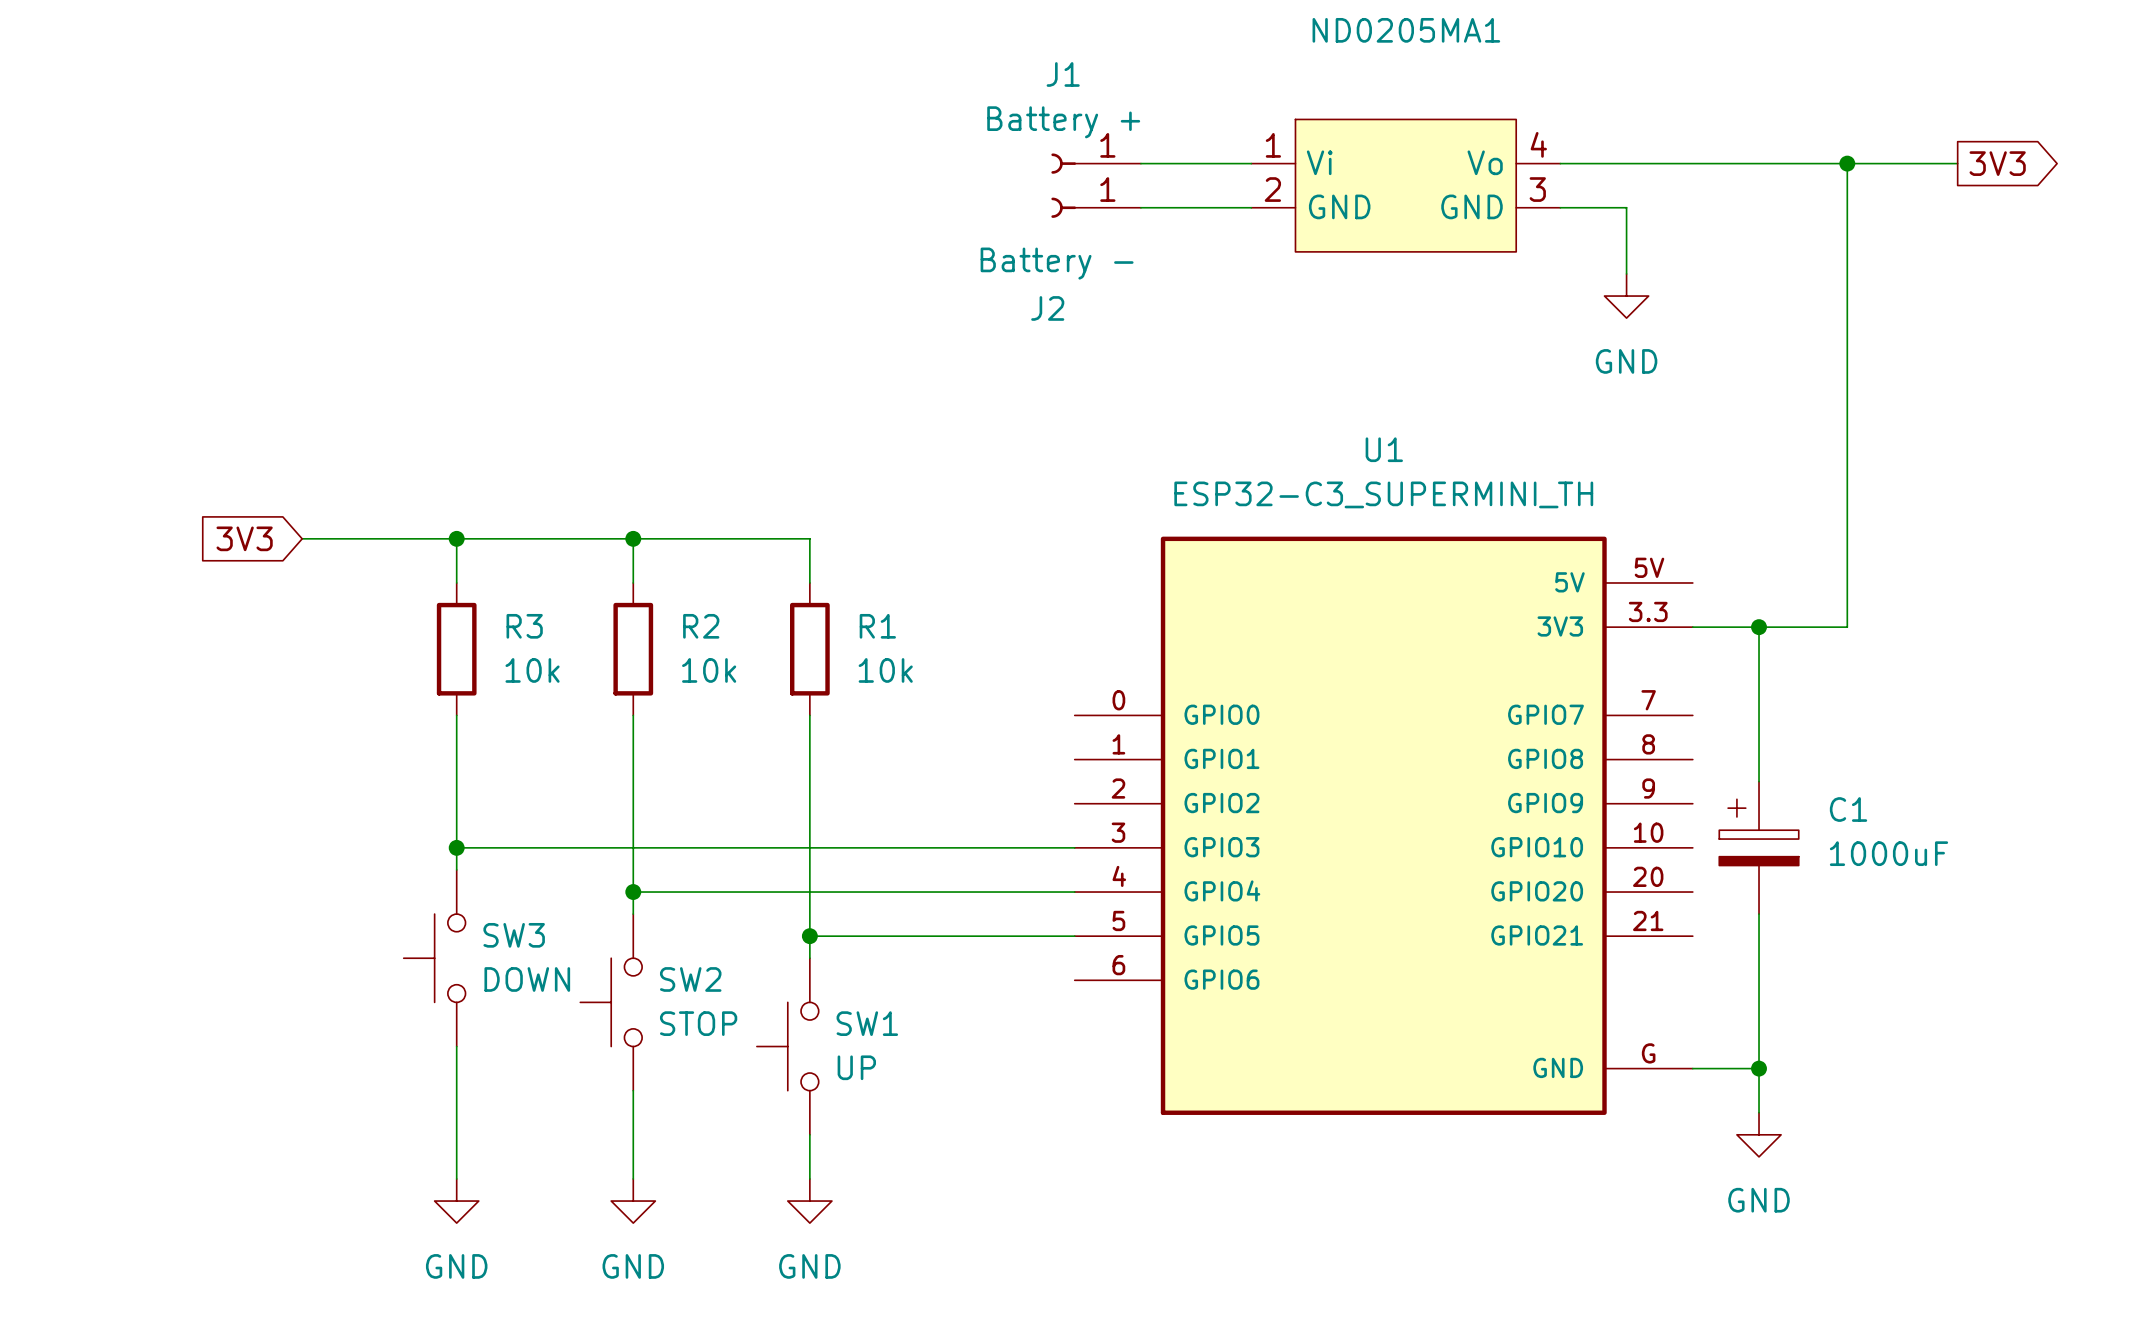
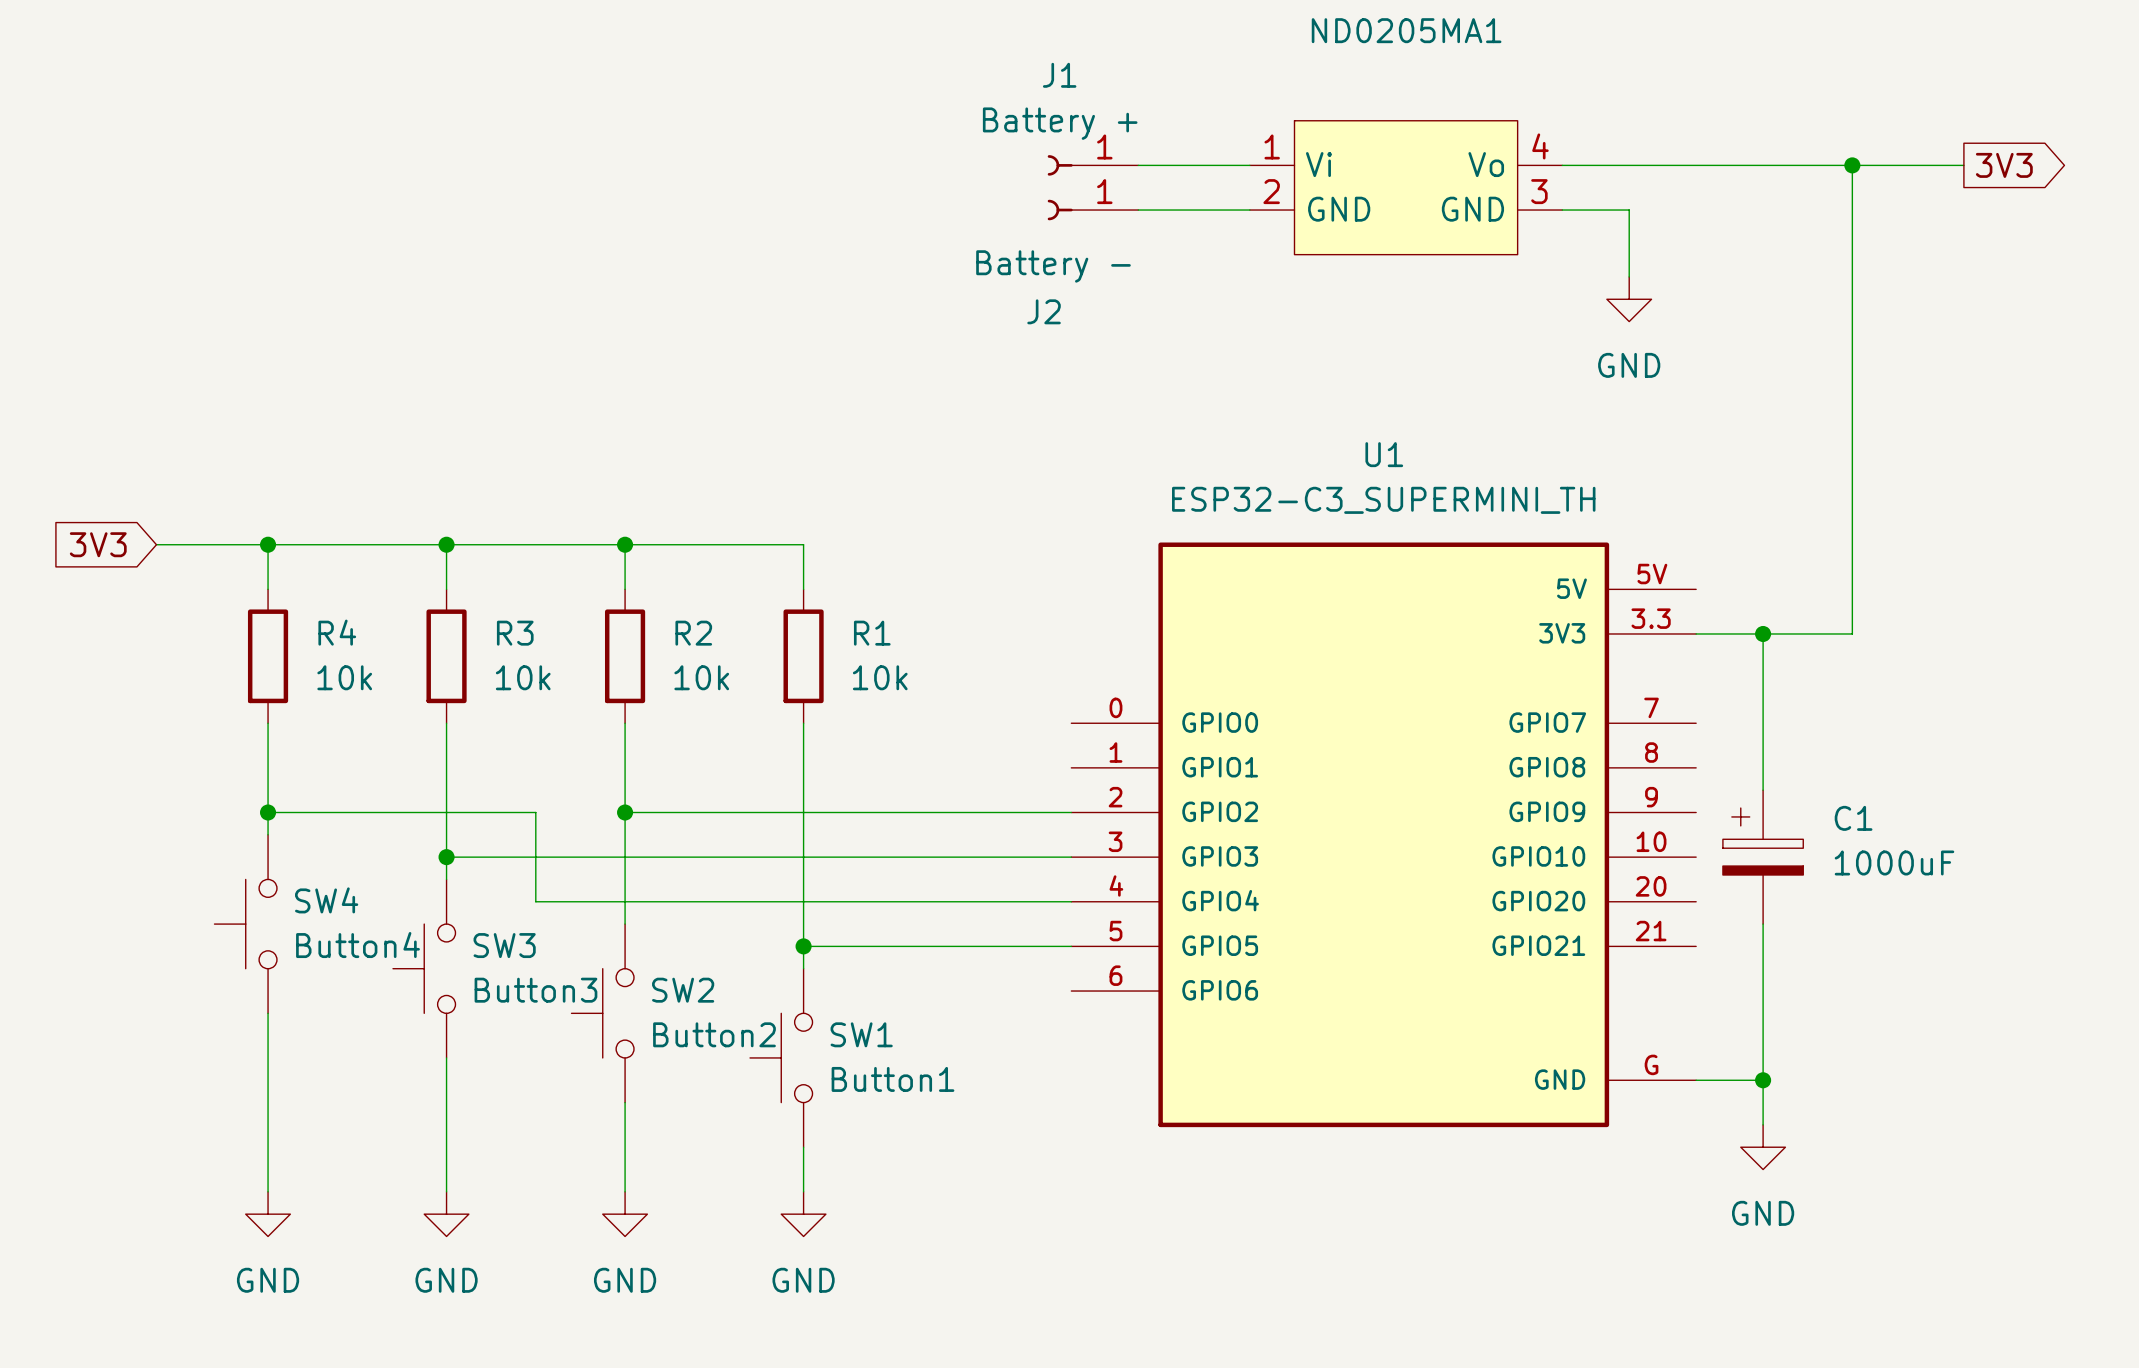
wire: none -> (156, 544) (290, 544)
global label position: 3V3 (244, 538) -> 3V3 (98, 544)
wire: none -> (268, 544) (268, 589)
junction: none -> (268, 544)
R4: none -> 10k (268, 656)
wire: none -> (268, 723) (268, 834)
wire: none -> (268, 812) (535, 812) (535, 901) (625, 901)
junction: none -> (268, 812)
wire: none -> (625, 812) (1071, 812)
junction position: (633, 892) -> (625, 812)
SW4: none -> Button4 (245, 924)
SW3 value: DOWN (527, 979) -> Button3 (535, 990)
wire: none -> (268, 1013) (268, 1191)
SW2 value: STOP (698, 1023) -> Button2 (714, 1034)
SW1 value: UP (856, 1067) -> Button1 (893, 1079)
power symbol: none -> GND (268, 1214)

